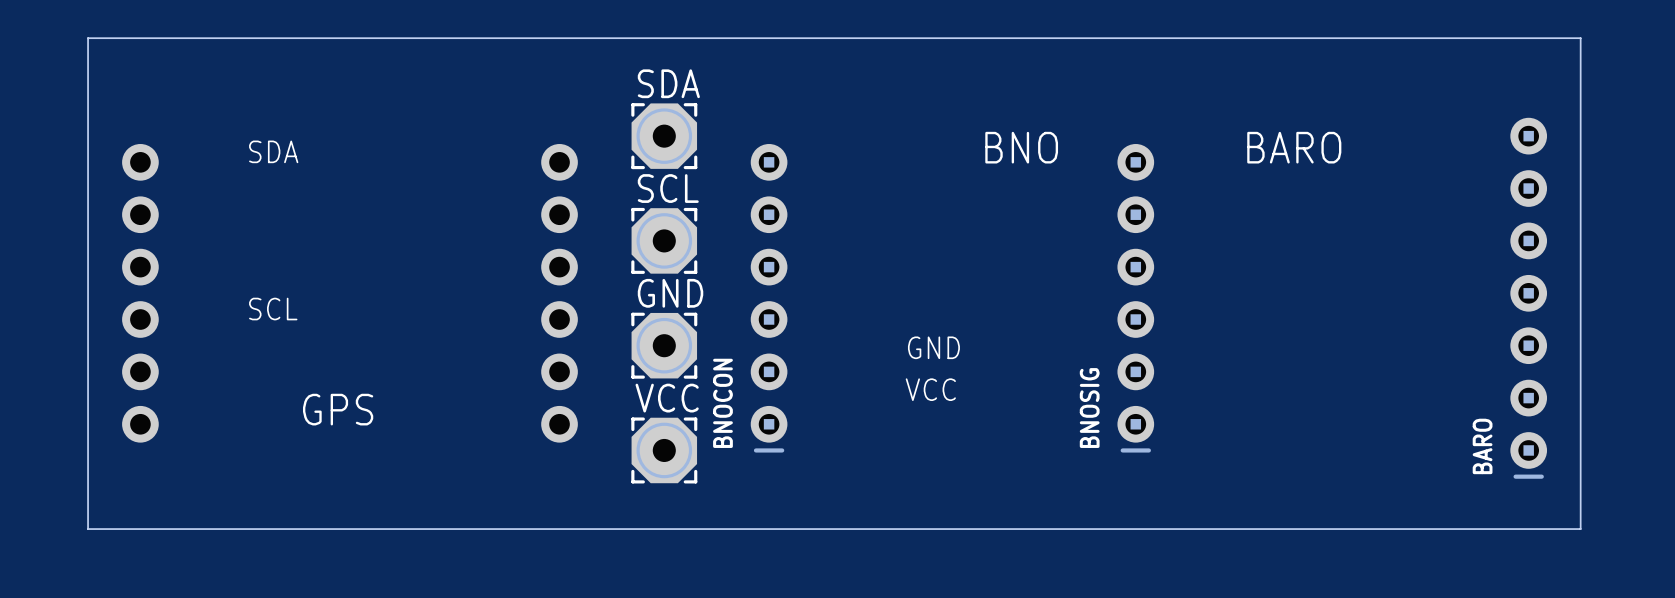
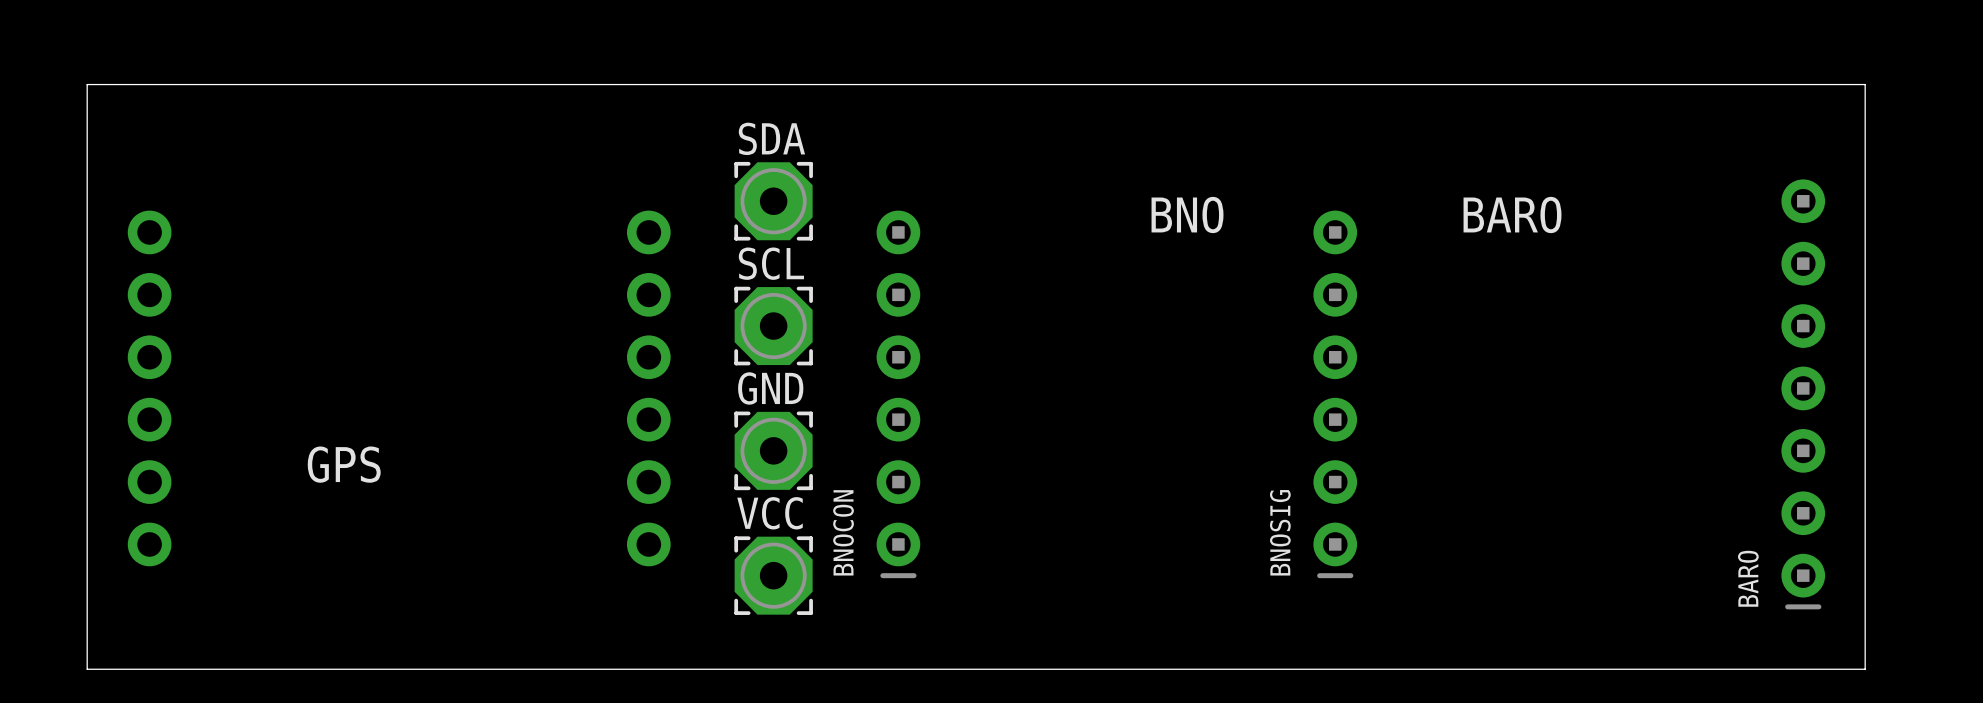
text: SDA (273, 151) -> none
text: SCL (273, 309) -> none
text: GND (933, 347) -> none
text: VCC (930, 389) -> none
text position: GPS (338, 409) -> GPS (344, 464)

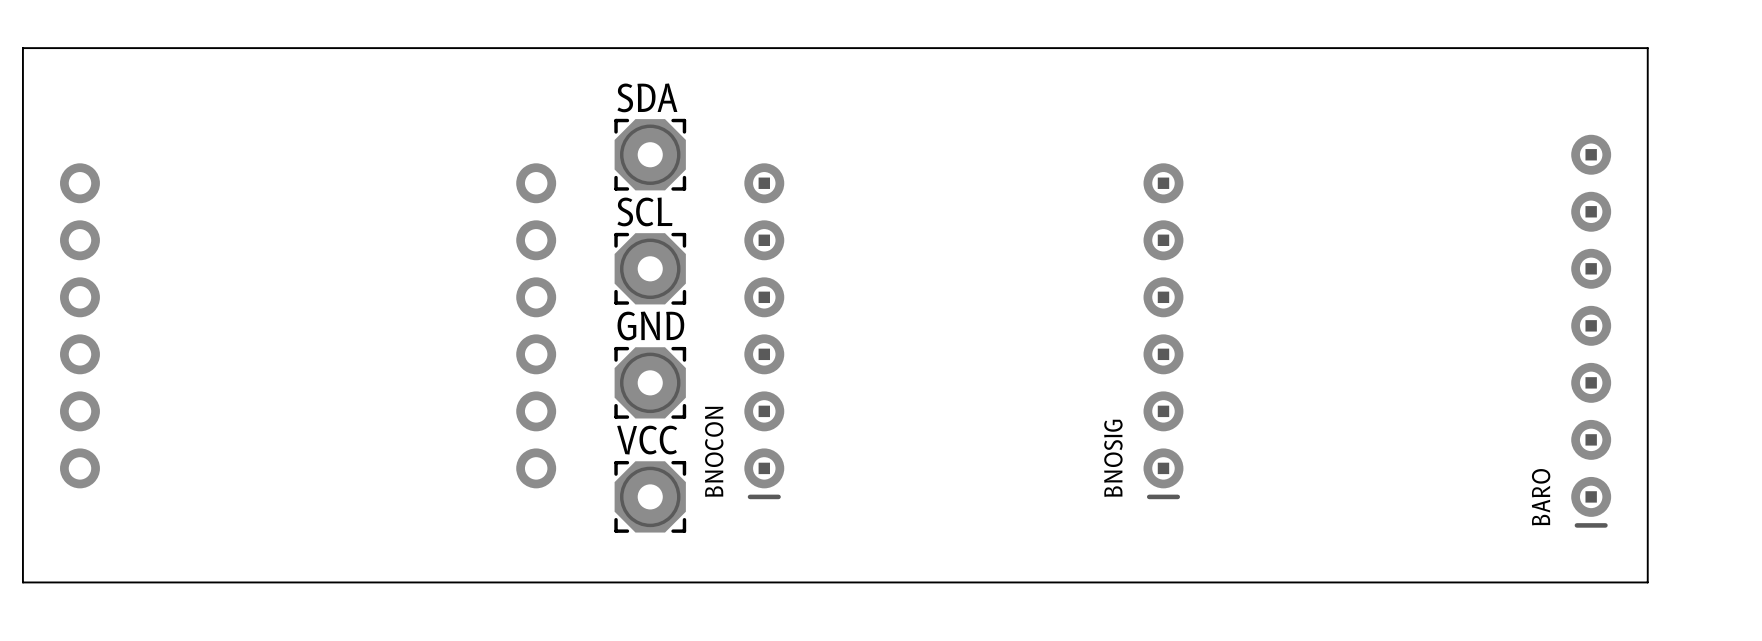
text: BNO (1187, 215) -> none
text: BARO (1512, 215) -> none
text: GPS (344, 464) -> none

